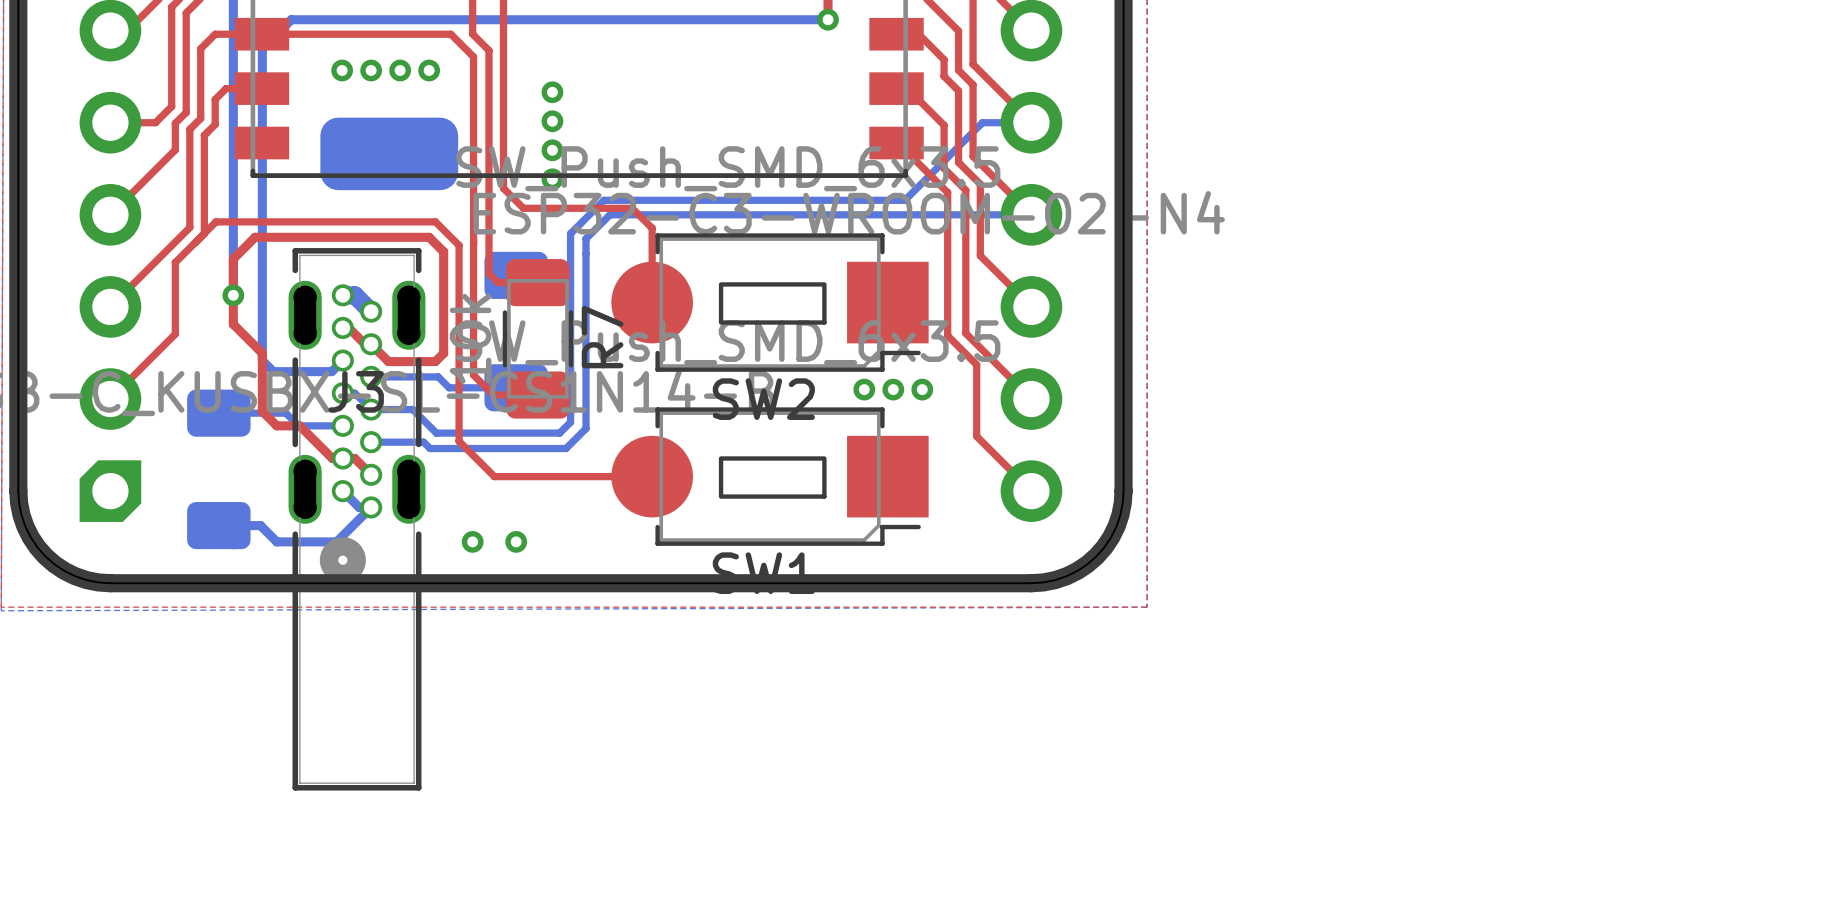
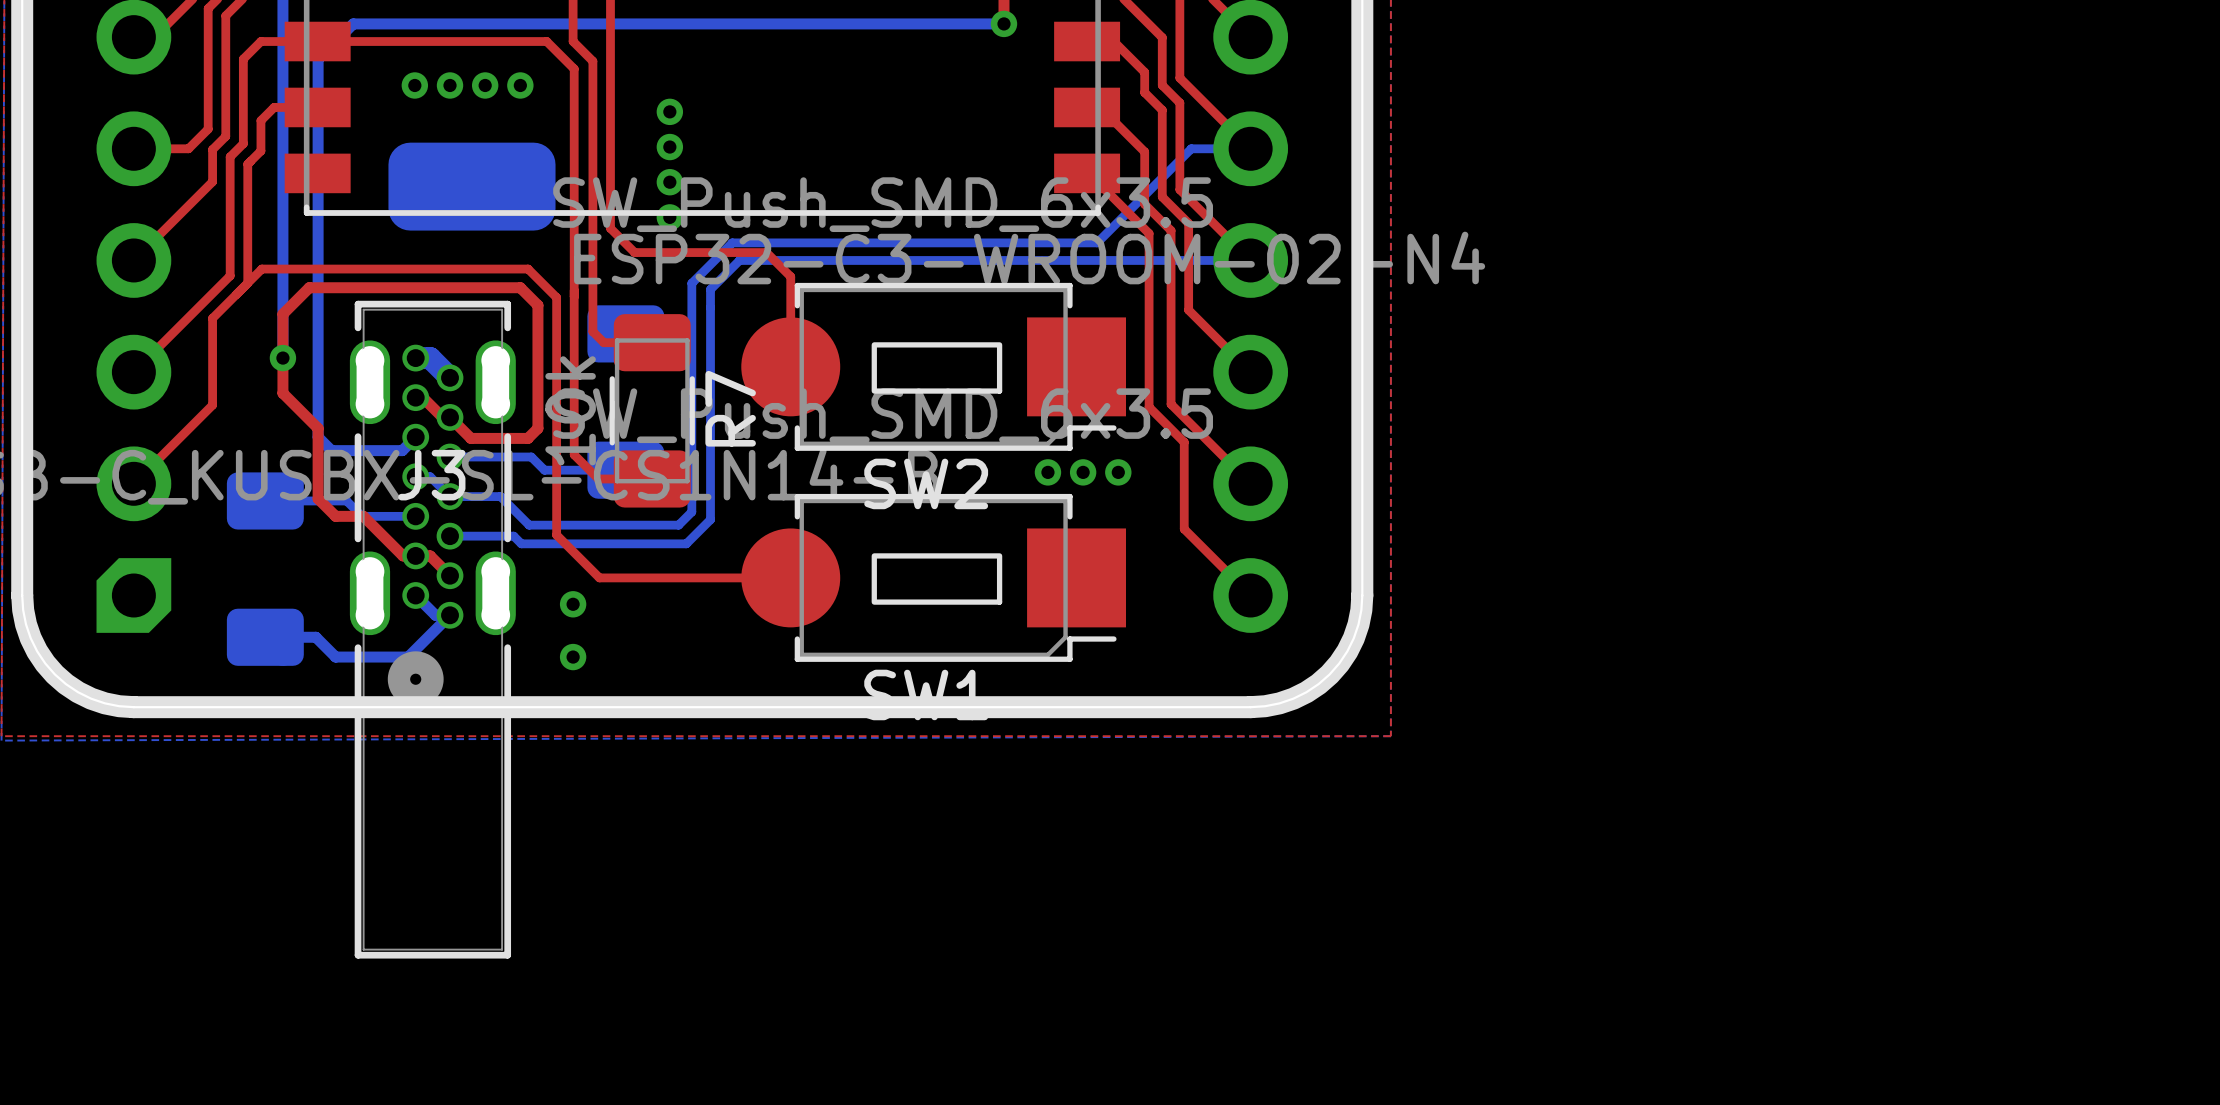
via position: (516, 541) -> (573, 604)

